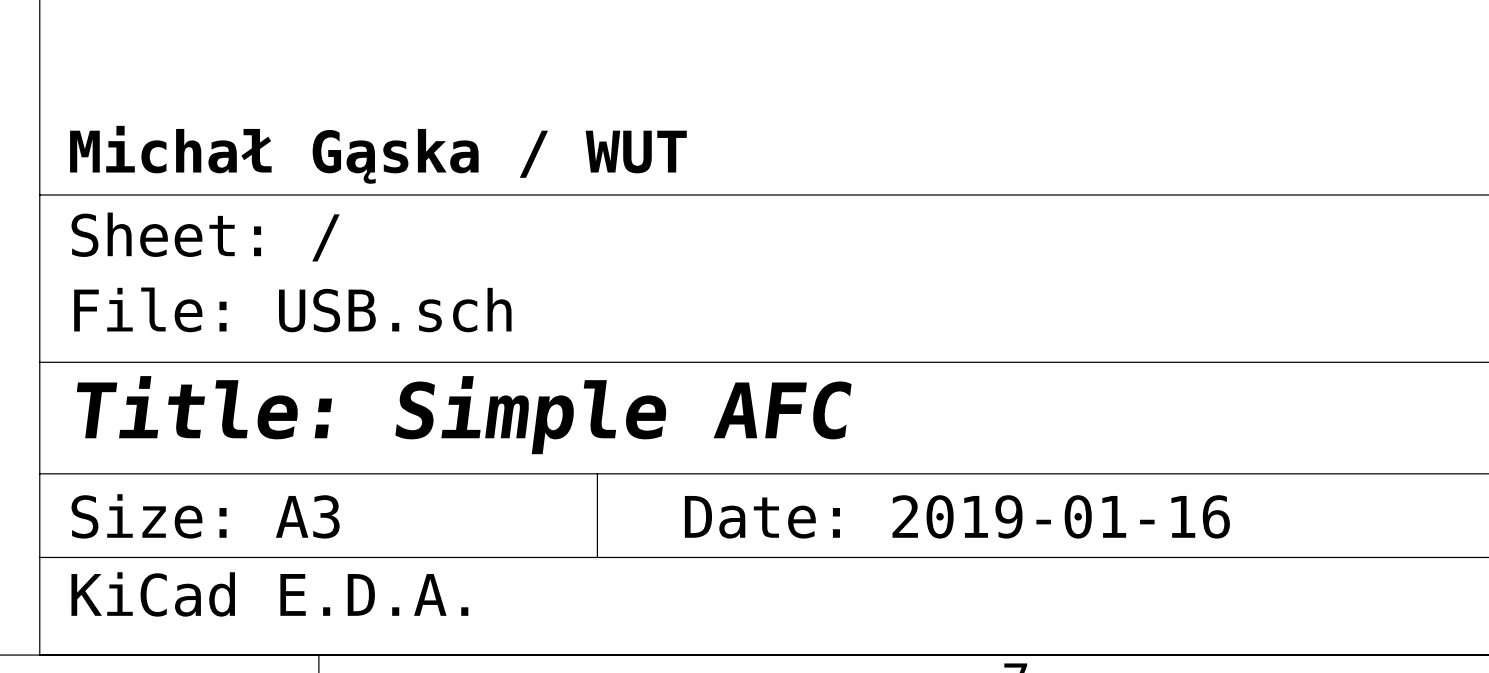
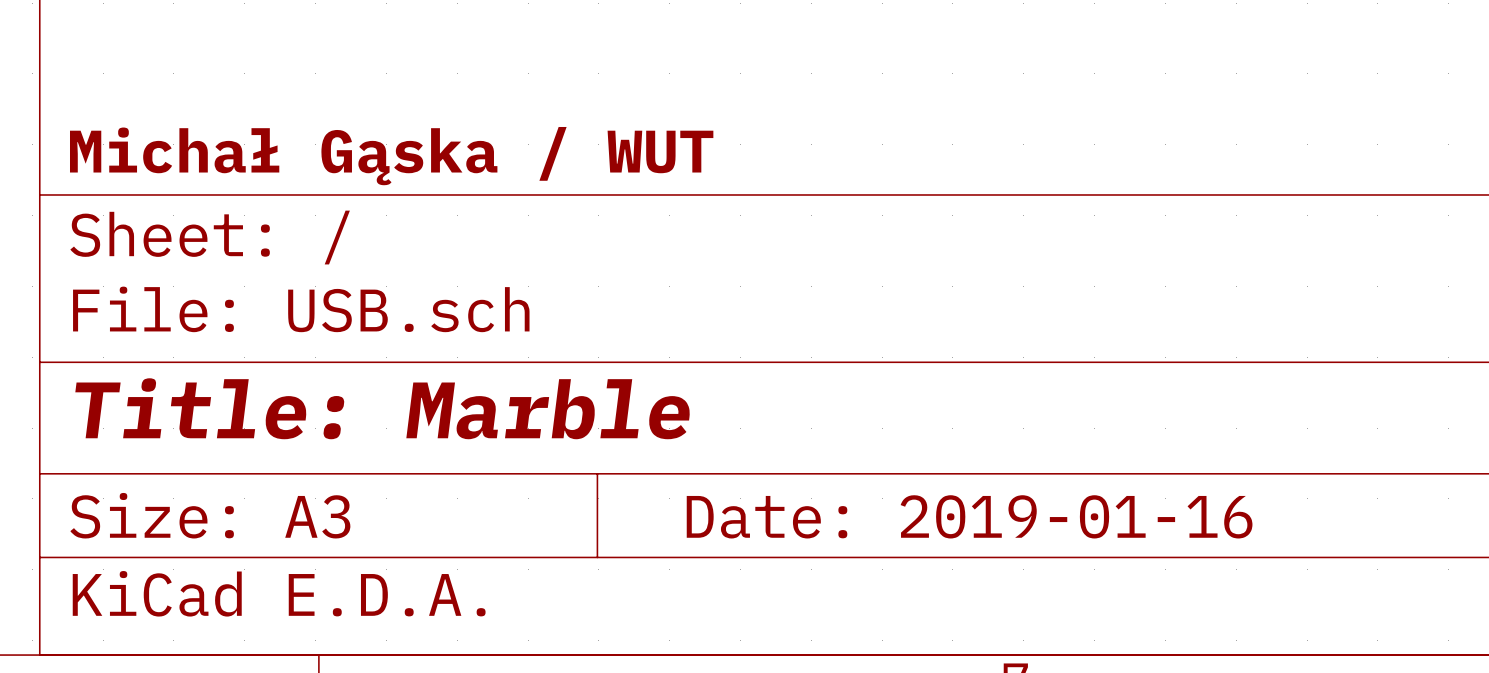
title block: Title: Simple AFC (464, 415) -> Title: Marble (382, 408)

